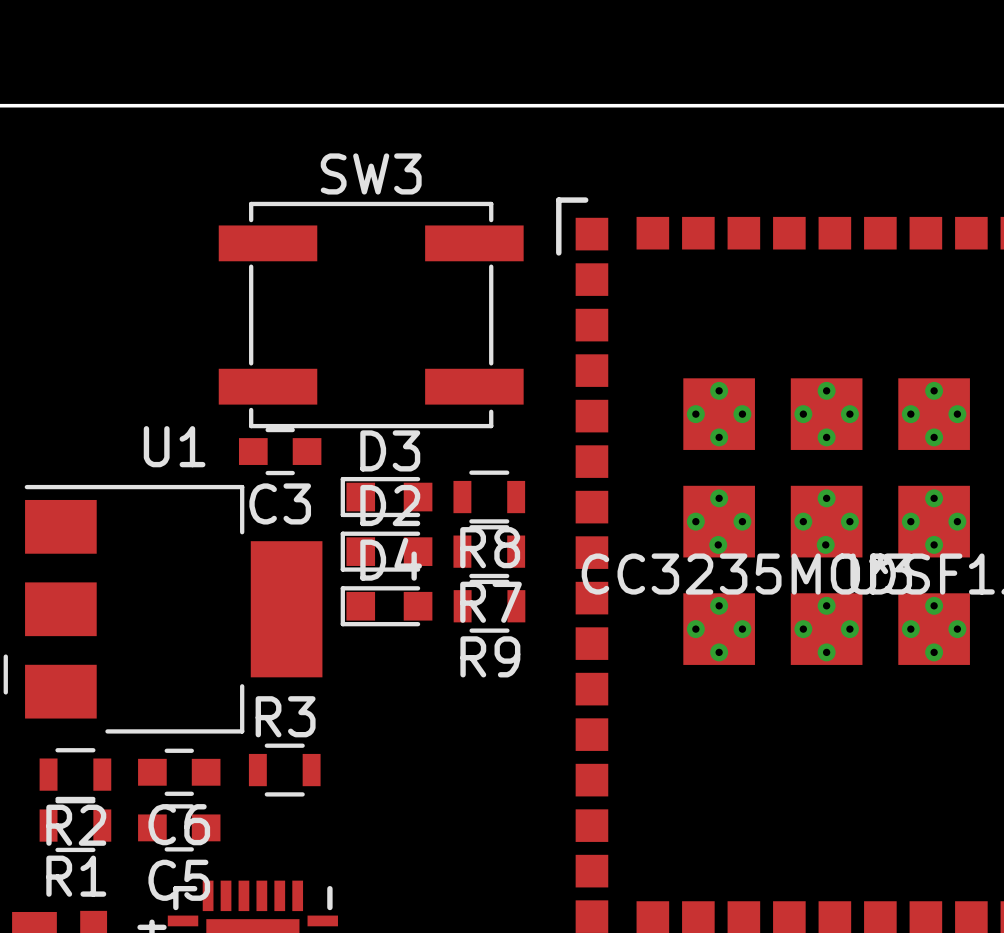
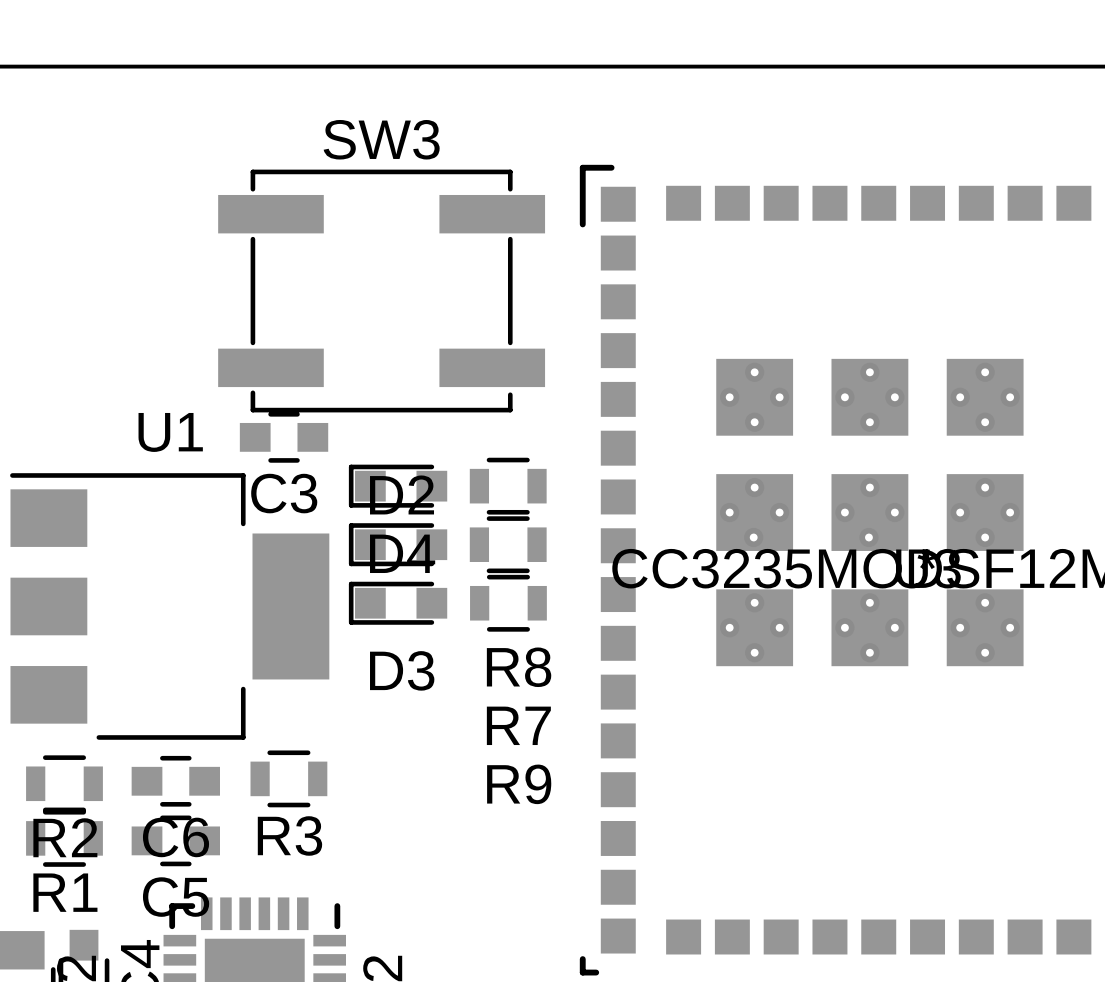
D3 name position: D3 (390, 450) -> D3 (402, 670)
R8 name position: R8 (490, 547) -> R8 (519, 667)
R7 name position: R7 (491, 602) -> R7 (518, 725)
R9 name position: R9 (490, 656) -> R9 (519, 784)
R3 name position: R3 (285, 716) -> R3 (289, 835)

